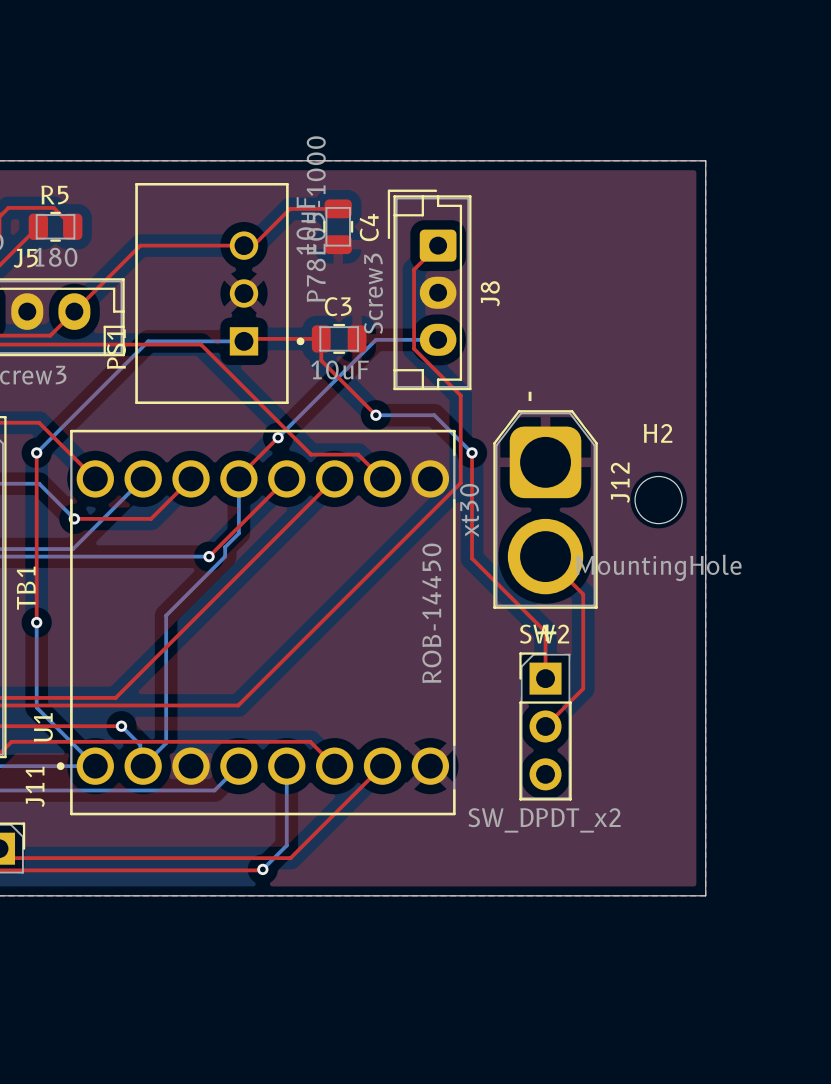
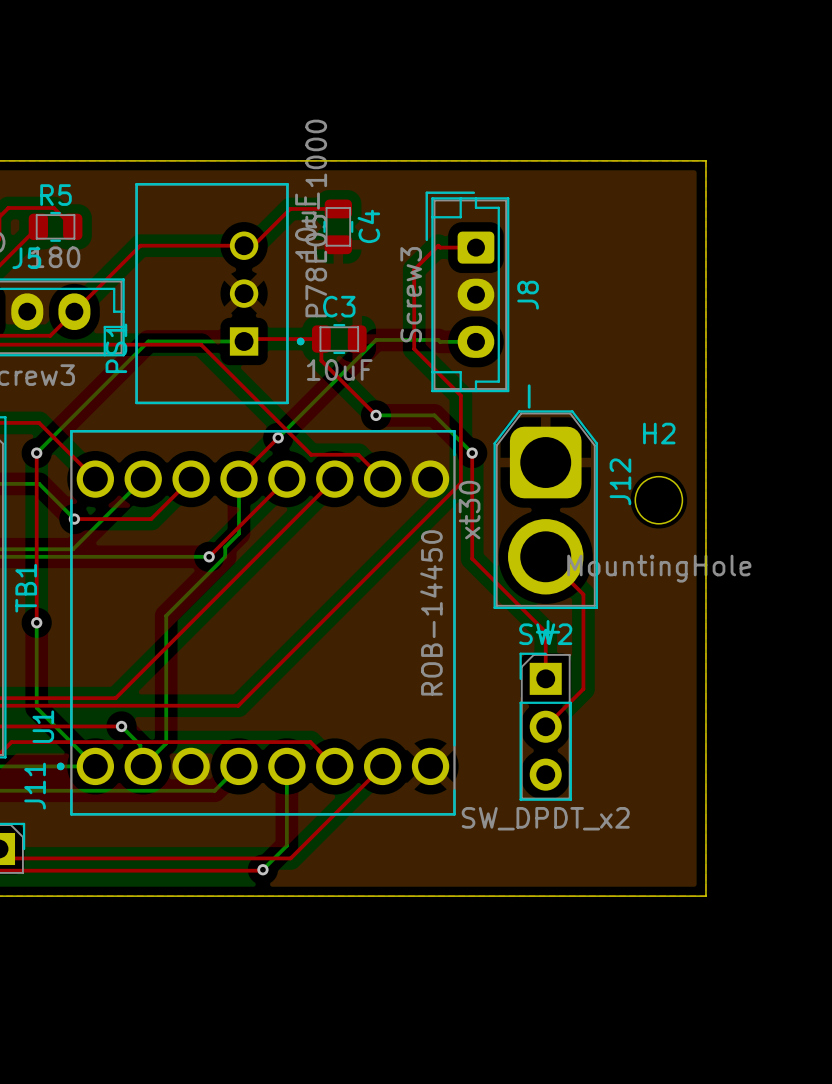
top track: none -> (438, 245) (440, 247) (475, 247)
J8 position: (429, 289) -> (467, 291)
bottom track: none -> (438, 339) (440, 341) (475, 341)

